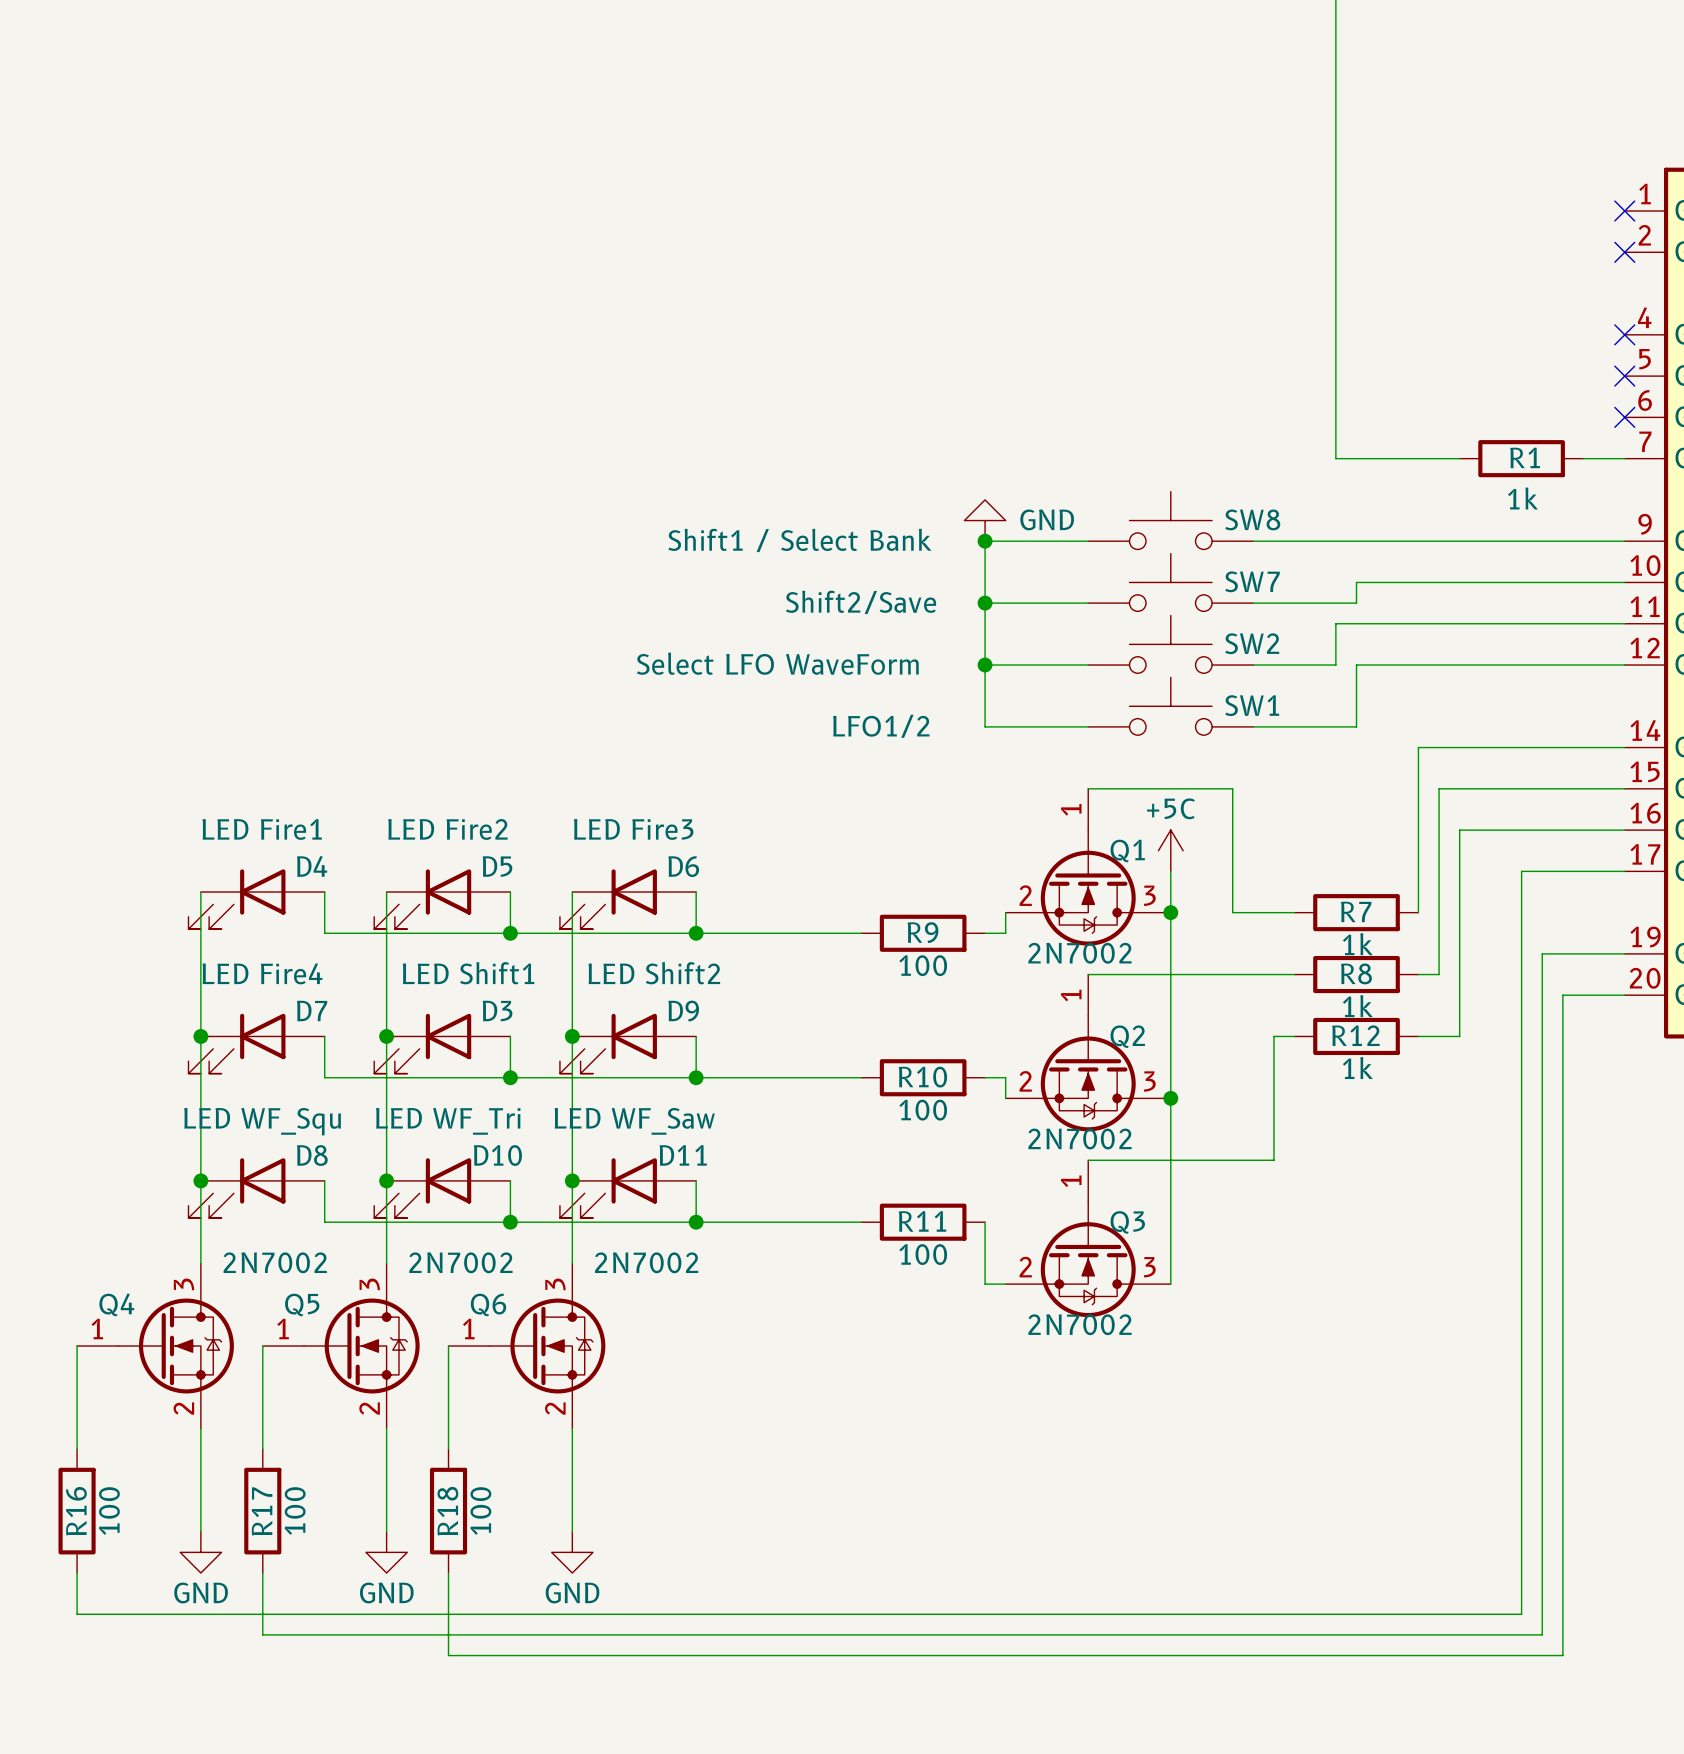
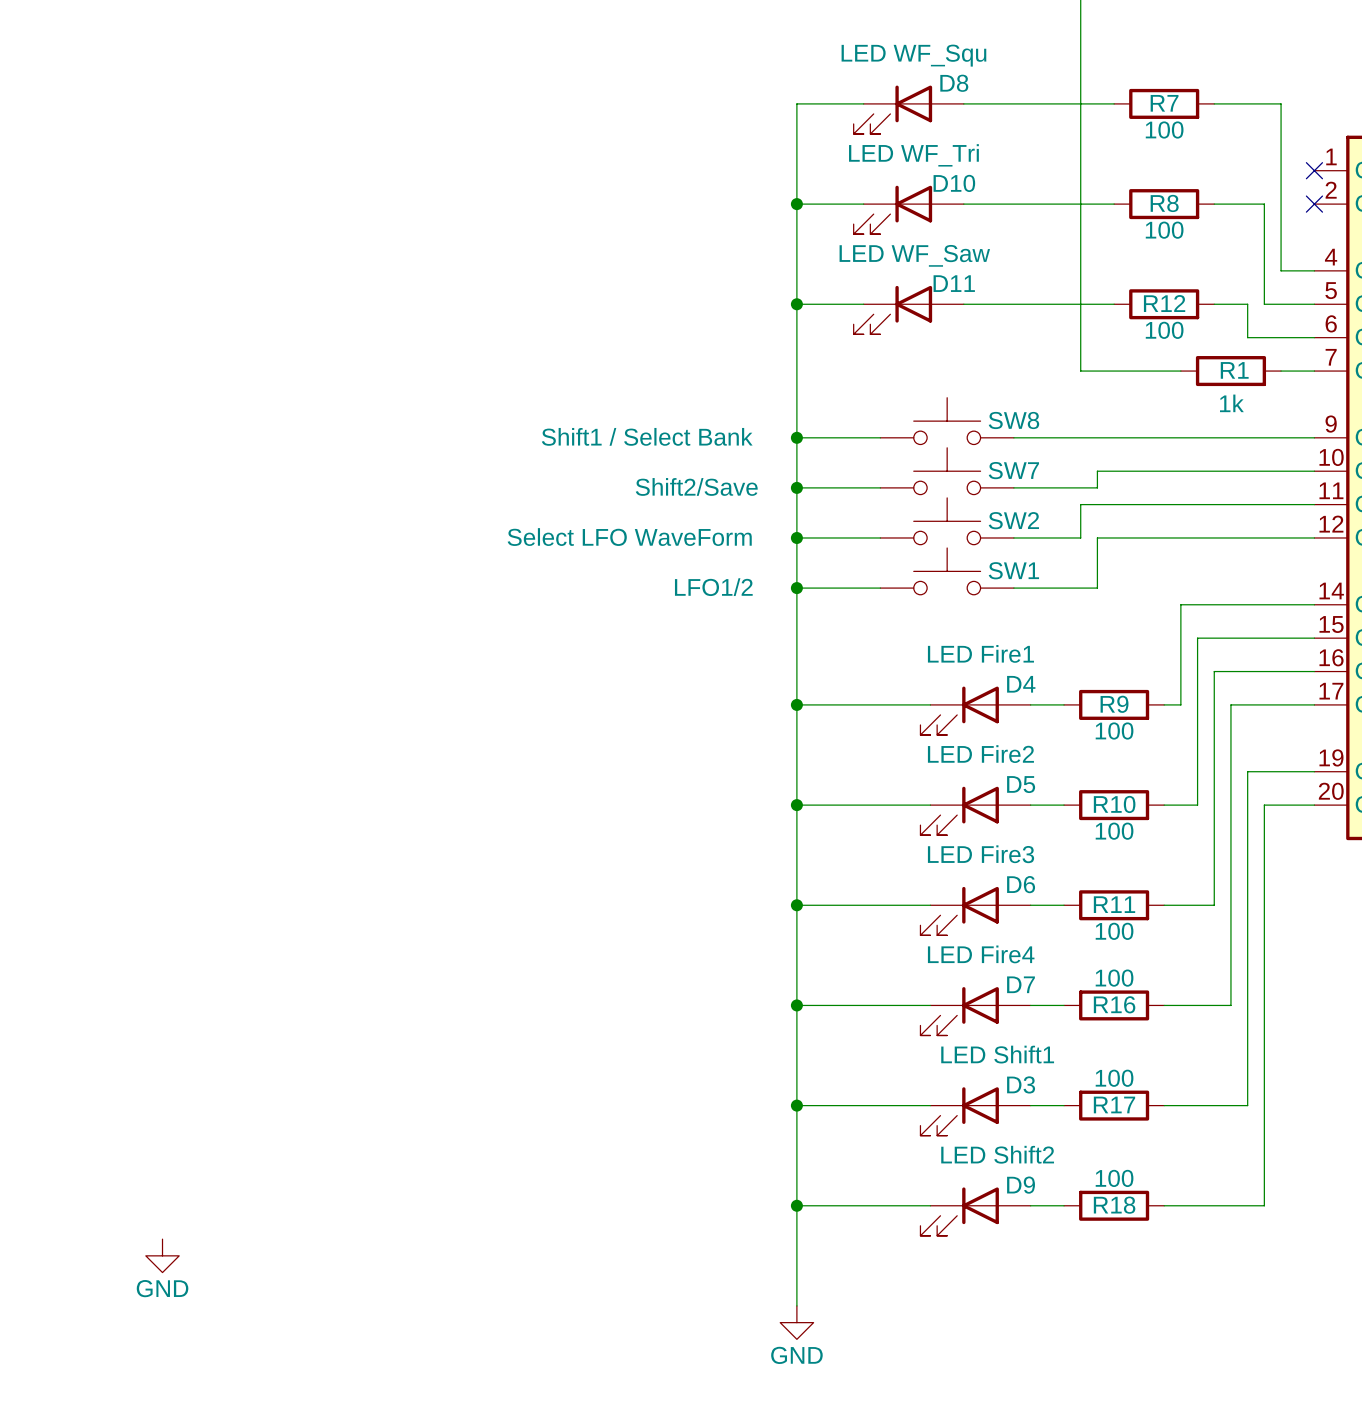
wire: none -> (863, 103) (796, 103) (796, 437)
wire: none -> (963, 103) (1114, 103)
wire: none -> (1214, 103) (1281, 103) (1281, 270) (1314, 270)
wire: none -> (796, 204) (863, 204)
junction: none -> (796, 204)
wire: none -> (963, 204) (1114, 204)
wire: none -> (1214, 204) (1264, 204) (1264, 304) (1314, 304)
no-connect mark: (1624, 334) -> none
wire: none -> (796, 304) (863, 304)
junction: none -> (796, 304)
wire: none -> (963, 304) (1114, 304)
wire: none -> (1214, 304) (1247, 304) (1247, 337) (1314, 337)
no-connect mark: (1624, 376) -> none
no-connect mark: (1624, 417) -> none
power symbol: GND (985, 520) -> none
wire: none -> (796, 588) (796, 988)
junction: none -> (796, 588)
wire: (1459, 747) (1418, 747) (1418, 912) -> (1180, 604) (1180, 671)
wire: (1088, 788) (1232, 788) (1232, 912) (1294, 912) -> none
wire: (1480, 788) (1439, 788) (1439, 974) (1418, 974) -> (1197, 638) (1197, 805) (1164, 805)
wire: (1459, 830) (1500, 830) -> (1164, 905) (1214, 905) (1214, 671)
power symbol: +5C (1170, 850) -> none
Q1: 2N7002 (1088, 867) -> none
wire: none -> (796, 704) (930, 704)
junction: none -> (796, 704)
wire: (1170, 871) (1170, 1284) -> none
wire: none -> (1030, 704) (1064, 704)
wire: (1459, 871) (1459, 1036) (1418, 1036) -> (1180, 704) (1164, 704)
wire: (200, 892) (200, 1263) -> none
wire: (324, 892) (324, 933) (861, 933) -> none
wire: (386, 892) (386, 1263) -> none
wire: (510, 892) (510, 933) -> none
wire: (572, 892) (572, 1263) -> none
wire: (696, 892) (696, 933) -> none
D4 position: (256, 899) -> (975, 710)
D5 position: (442, 899) -> (975, 810)
D6 position: (628, 899) -> (975, 911)
wire: (1005, 912) (1005, 933) (985, 933) -> none
junction: (1170, 912) -> none
R7 position: (1356, 912) -> (1164, 103)
junction: (510, 933) -> none
junction: (696, 933) -> none
R9 position: (923, 933) -> (1114, 704)
R7 value: 1k (1357, 944) -> 100 (1164, 130)
wire: (1088, 974) (1294, 974) -> none
R8 position: (1356, 974) -> (1164, 204)
wire: none -> (796, 805) (930, 805)
junction: none -> (796, 805)
wire: none -> (1030, 805) (1064, 805)
R8 value: 1k (1357, 1006) -> 100 (1164, 230)
junction: (200, 1036) -> none
wire: (324, 1036) (324, 1077) (861, 1077) -> none
junction: (386, 1036) -> none
wire: (510, 1036) (510, 1077) -> none
junction: (572, 1036) -> none
wire: (696, 1036) (696, 1077) -> none
wire: (1294, 1036) (1273, 1036) (1273, 1160) (1088, 1160) -> none
R12 position: (1356, 1036) -> (1164, 304)
D7 position: (256, 1043) -> (975, 1011)
D3 position: (442, 1043) -> (975, 1111)
D9 position: (628, 1043) -> (975, 1211)
Q2: 2N7002 (1088, 1052) -> none
R12 value: 1k (1357, 1068) -> 100 (1164, 330)
junction: (510, 1077) -> none
junction: (696, 1077) -> none
R10 position: (923, 1077) -> (1114, 805)
wire: (985, 1077) (1005, 1077) (1005, 1098) -> none
junction: (1170, 1098) -> none
wire: none -> (796, 905) (930, 905)
junction: none -> (796, 905)
wire: none -> (1030, 905) (1064, 905)
junction: (200, 1180) -> none
wire: (324, 1180) (324, 1222) (861, 1222) -> none
junction: (386, 1180) -> none
wire: (510, 1180) (510, 1222) -> none
junction: (572, 1180) -> none
wire: (696, 1180) (696, 1222) -> none
D8 position: (256, 1188) -> (908, 109)
D10 position: (442, 1188) -> (908, 209)
D11 position: (628, 1188) -> (908, 310)
junction: (510, 1222) -> none
junction: (696, 1222) -> none
R11 position: (923, 1222) -> (1114, 905)
Q3: 2N7002 (1088, 1238) -> none
wire: none -> (796, 1005) (930, 1005)
junction: none -> (796, 1005)
wire: none -> (1030, 1005) (1064, 1005)
wire: (1521, 1242) (1521, 1614) (77, 1614) (77, 1573) -> (1230, 1005) (1164, 1005)
wire: (985, 1284) (1005, 1284) -> (796, 1038) (796, 1305)
wire: (77, 1346) (77, 1449) -> none
Q4: 2N7002 (155, 1346) -> none
wire: (262, 1346) (262, 1449) -> none
Q5: 2N7002 (341, 1346) -> none
wire: (448, 1346) (448, 1449) -> none
Q6: 2N7002 (526, 1346) -> none
wire: none -> (796, 1105) (930, 1105)
junction: none -> (796, 1105)
wire: none -> (1030, 1105) (1064, 1105)
wire: (1542, 1366) (1542, 1634) (262, 1634) (262, 1573) -> (1247, 1105) (1164, 1105)
wire: (200, 1428) (200, 1531) -> none
wire: (386, 1428) (386, 1531) -> none
wire: (572, 1428) (572, 1531) -> none
wire: none -> (796, 1205) (930, 1205)
junction: none -> (796, 1205)
wire: none -> (1030, 1205) (1064, 1205)
wire: (1562, 1490) (1562, 1655) (448, 1655) (448, 1573) -> (1264, 1205) (1164, 1205)
R16 rotation: 0° (77, 1511) -> 90° clockwise (1114, 1005)
R16 position: (77, 1511) -> (1114, 1005)
R16 value position: 100 (109, 1511) -> 100 (1114, 978)
R17 rotation: 0° (262, 1511) -> 90° clockwise (1114, 1105)
R17 position: (262, 1511) -> (1114, 1105)
R17 value position: 100 (295, 1511) -> 100 (1114, 1078)
R18 rotation: 0° (448, 1511) -> 90° clockwise (1114, 1205)
R18 position: (448, 1511) -> (1114, 1205)
R18 value position: 100 (480, 1511) -> 100 (1114, 1178)
power symbol: GND (386, 1552) -> none
power symbol: GND (572, 1552) -> none
power symbol: none -> GND (796, 1322)

